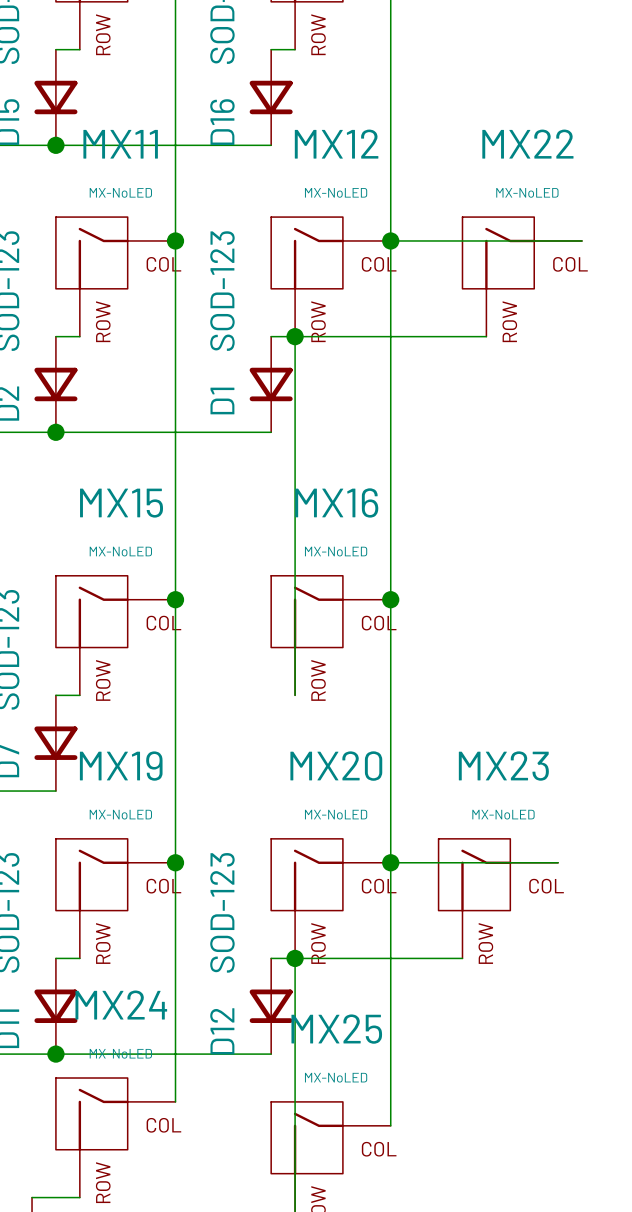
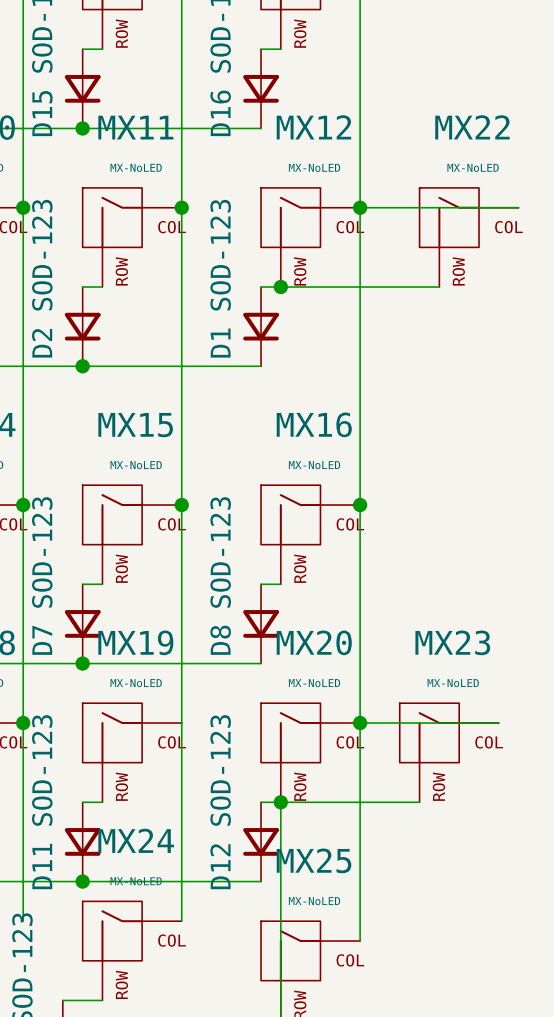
wire: (295, 336) (295, 695) -> (261, 584) (280, 584)
D8: none -> SOD-123 (261, 623)
wire: none -> (82, 663) (261, 663)
junction: none -> (82, 663)
junction: (175, 862) -> none

